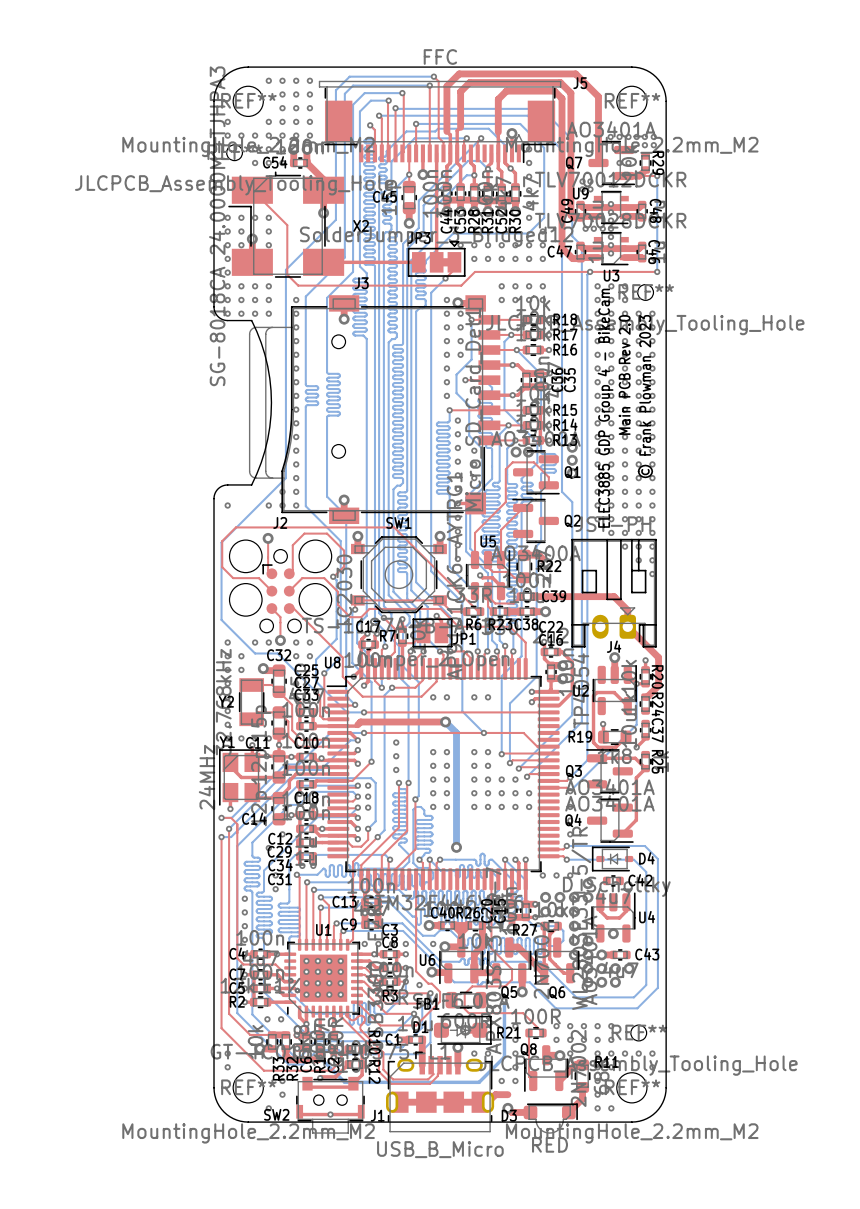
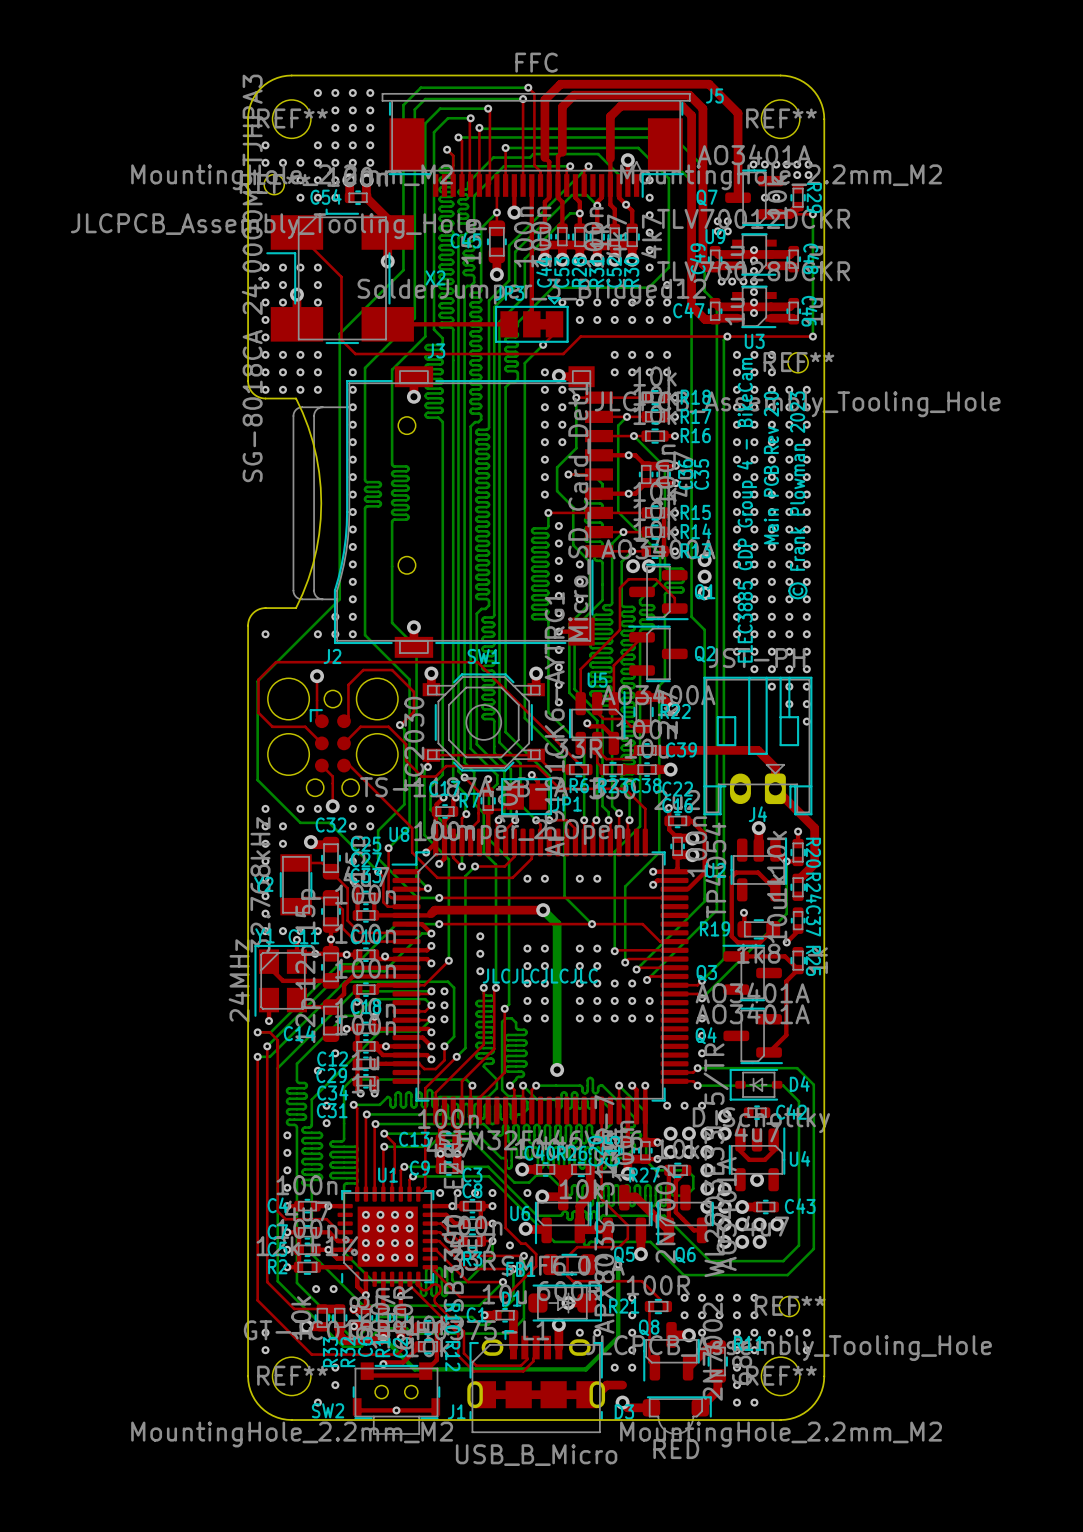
text: none -> JLCJLCJLCJLC (540, 976)

